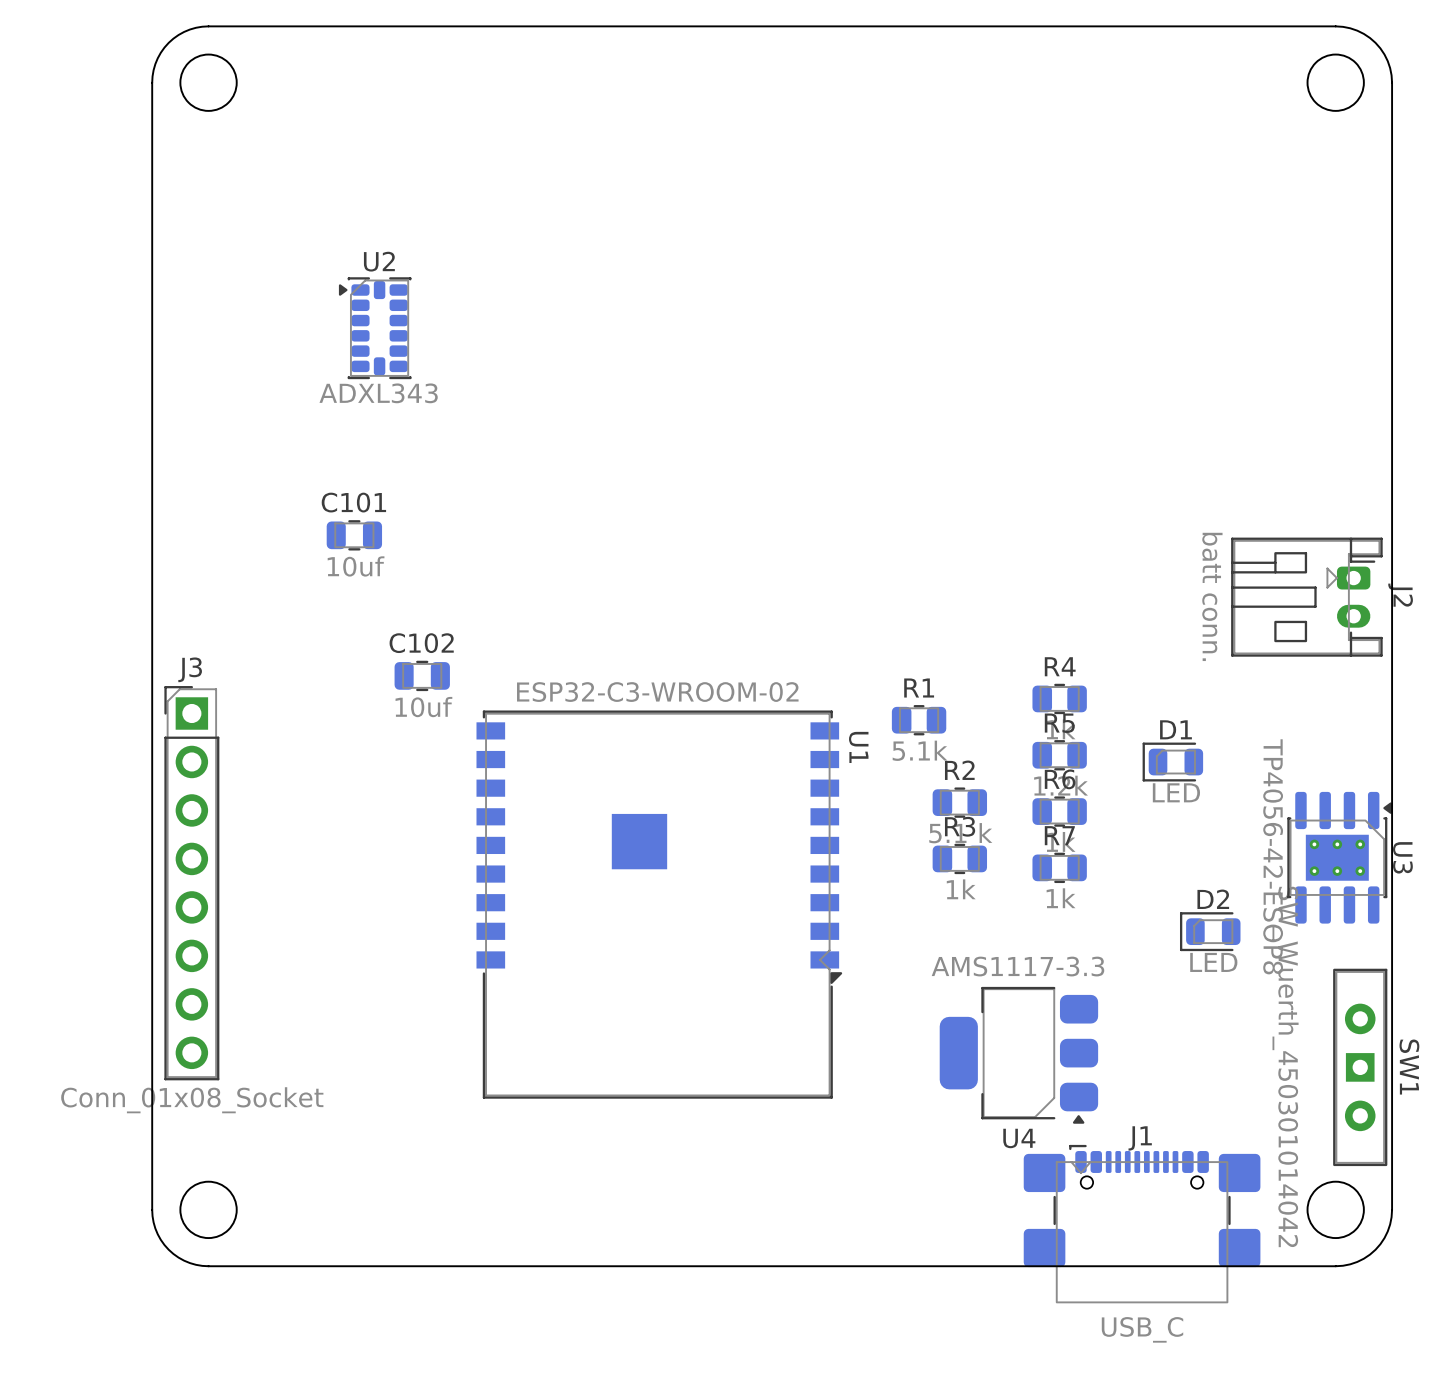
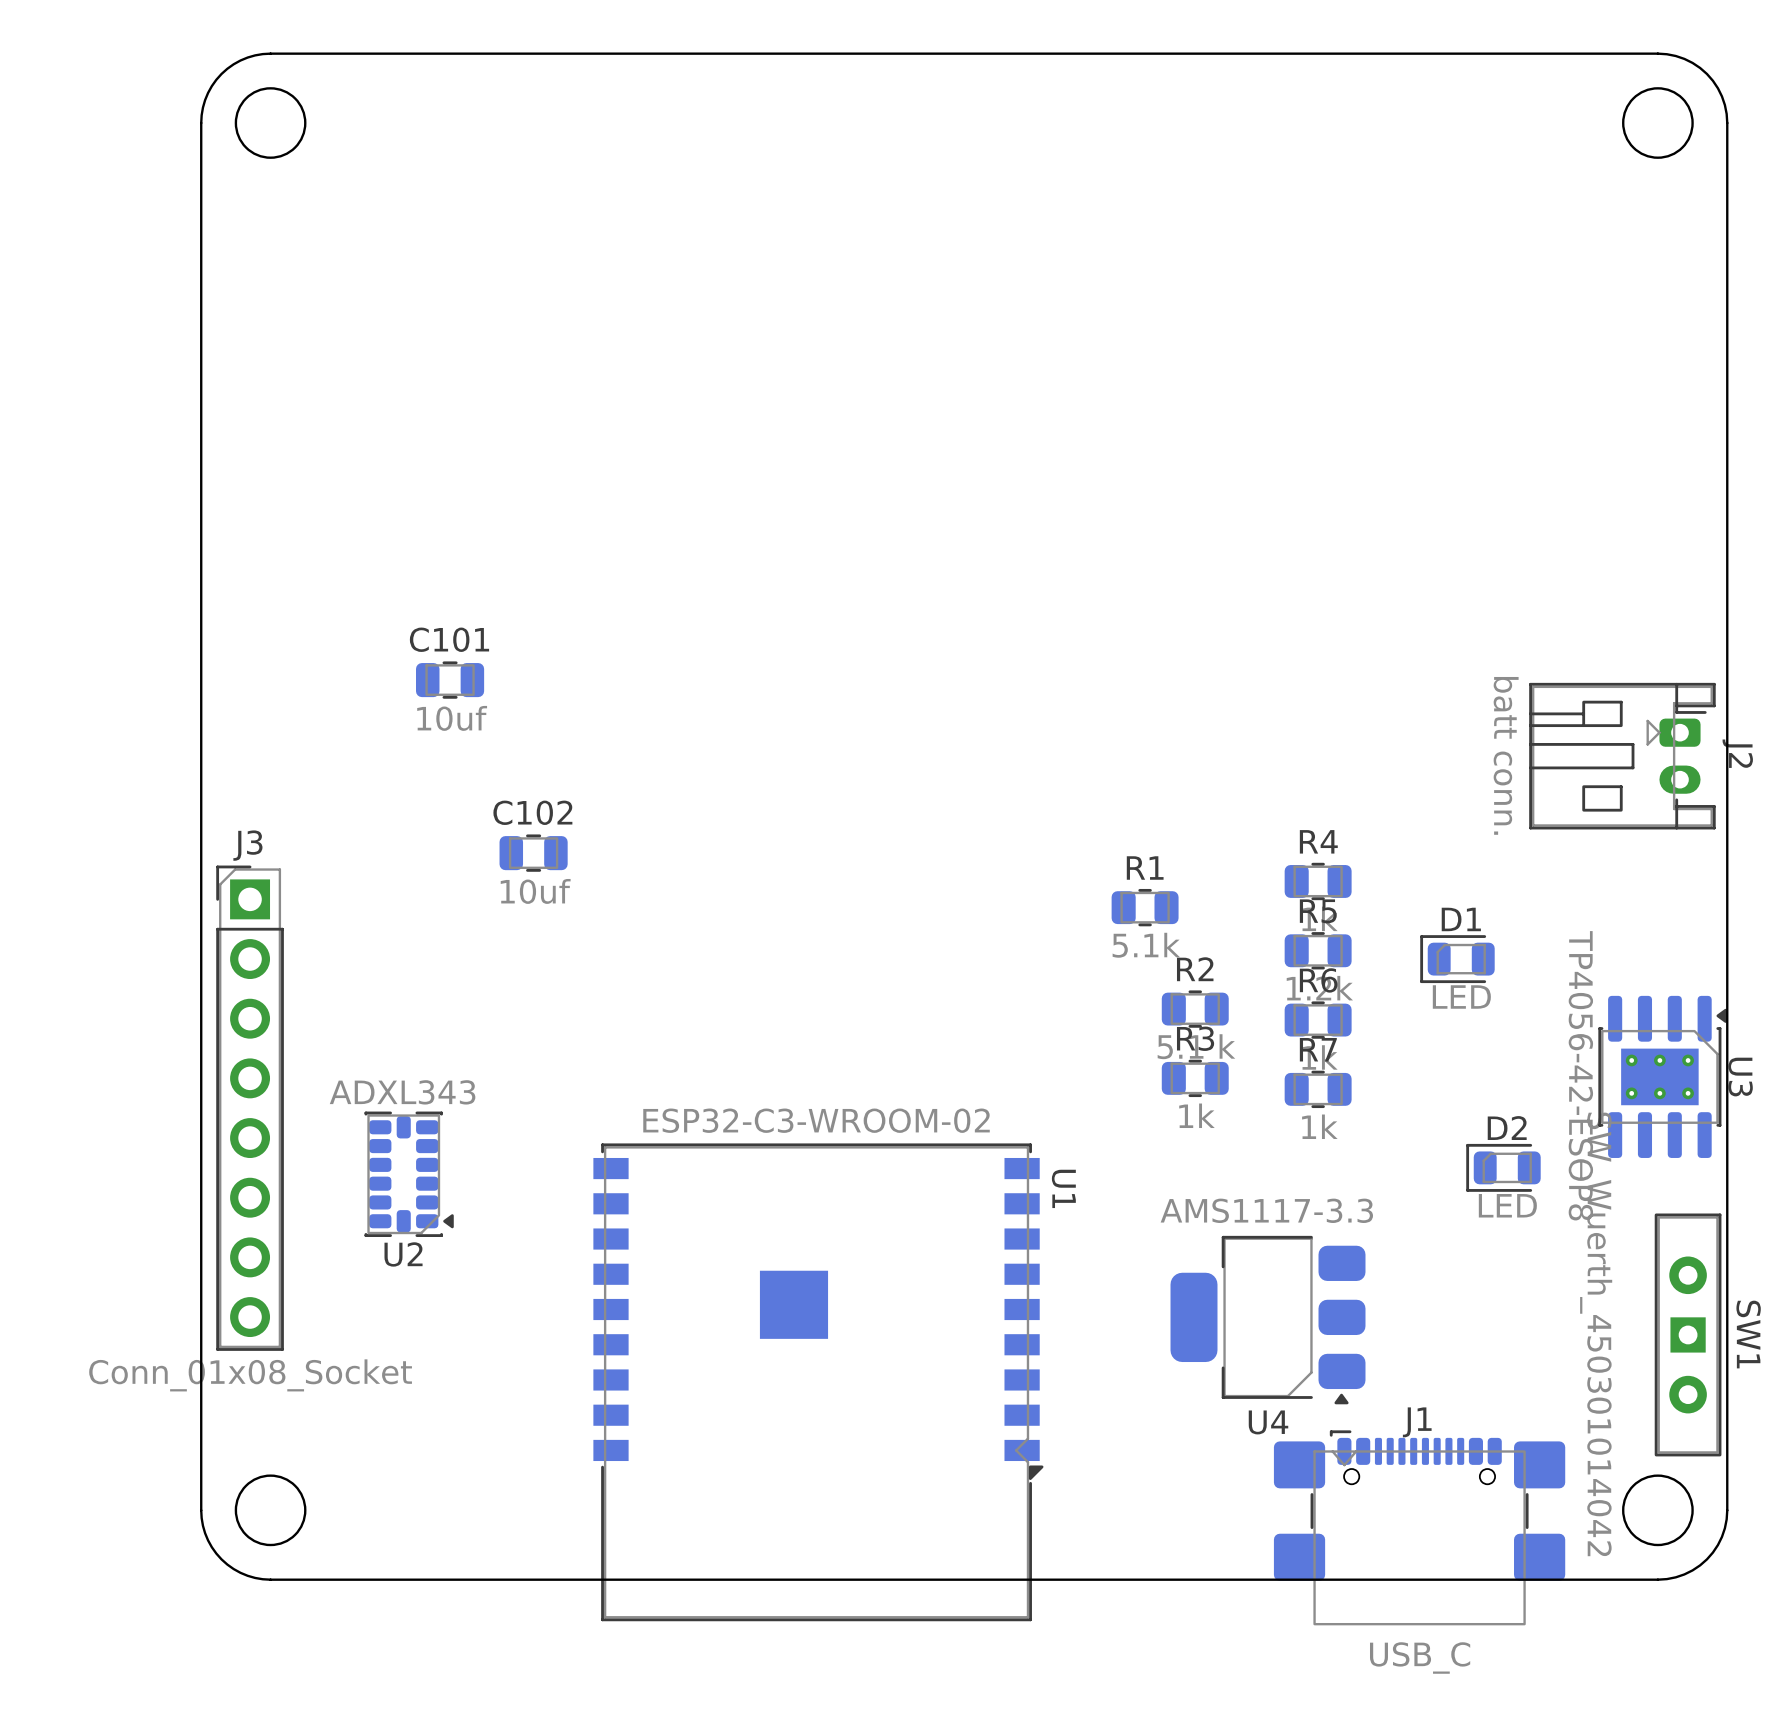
U2 rotation: 0° (375, 328) -> 180° (409, 1174)
U2 position: (375, 328) -> (409, 1174)
U1 position: (659, 904) -> (818, 1382)

